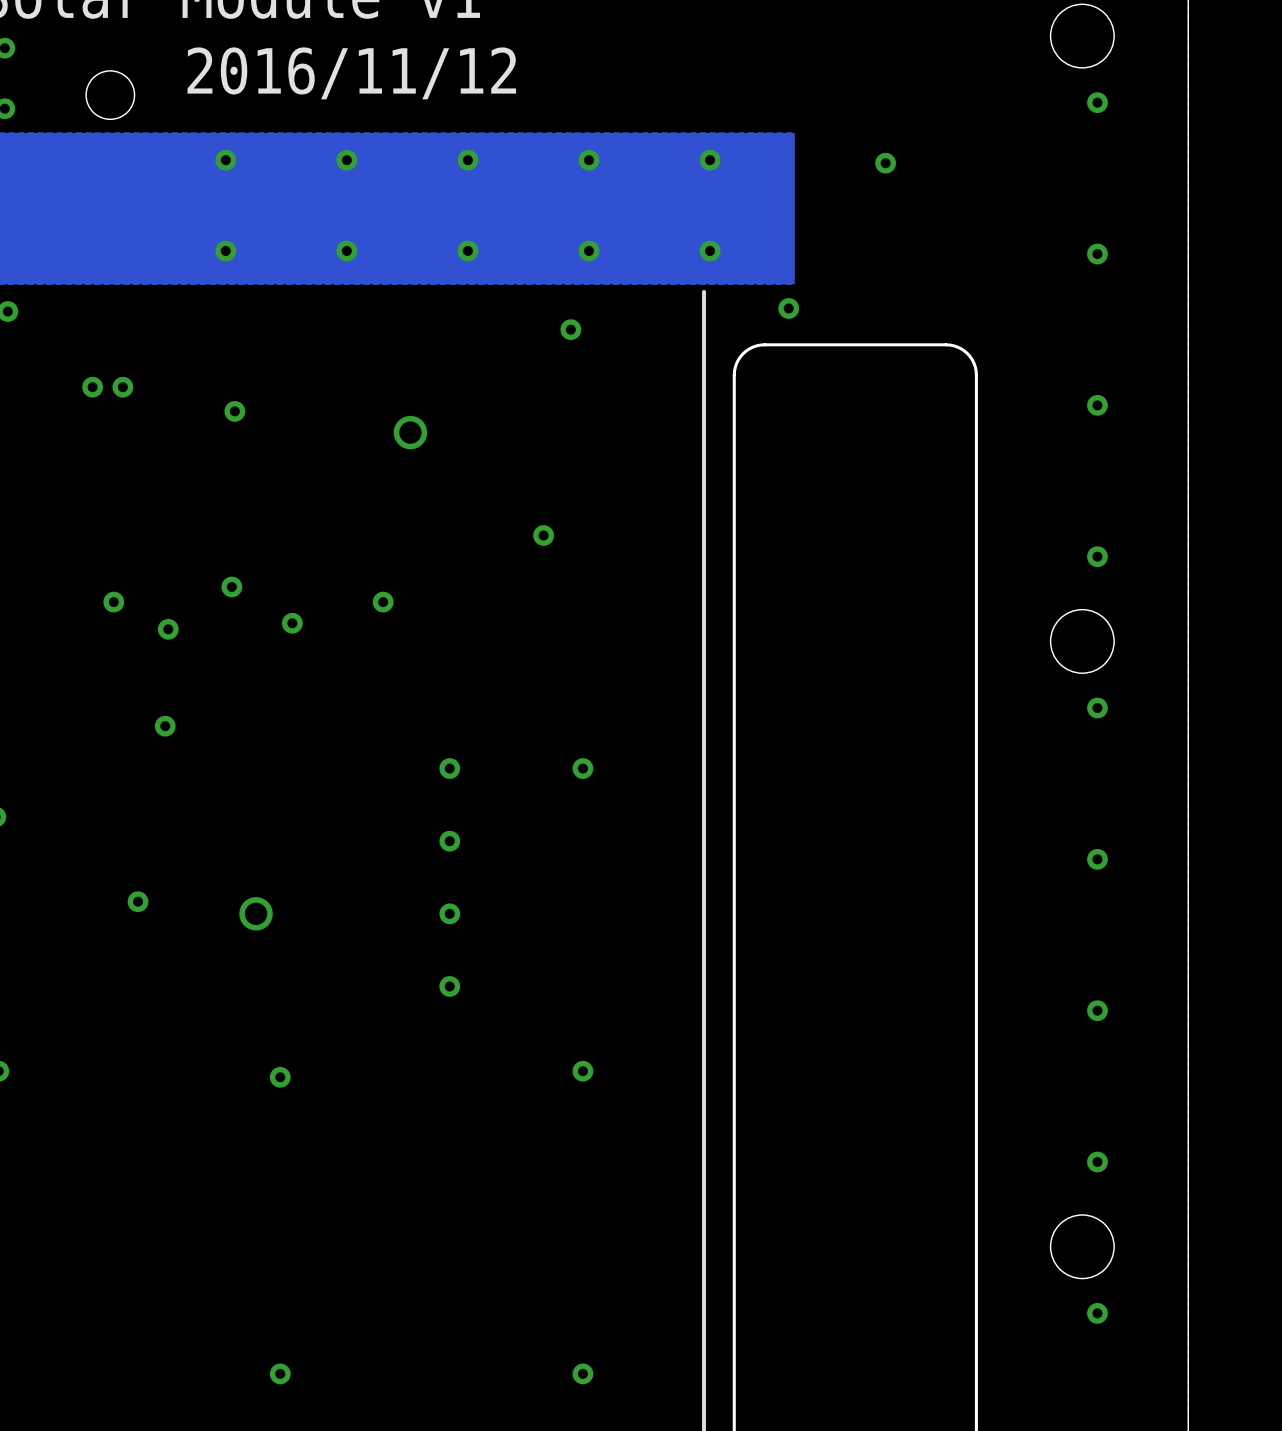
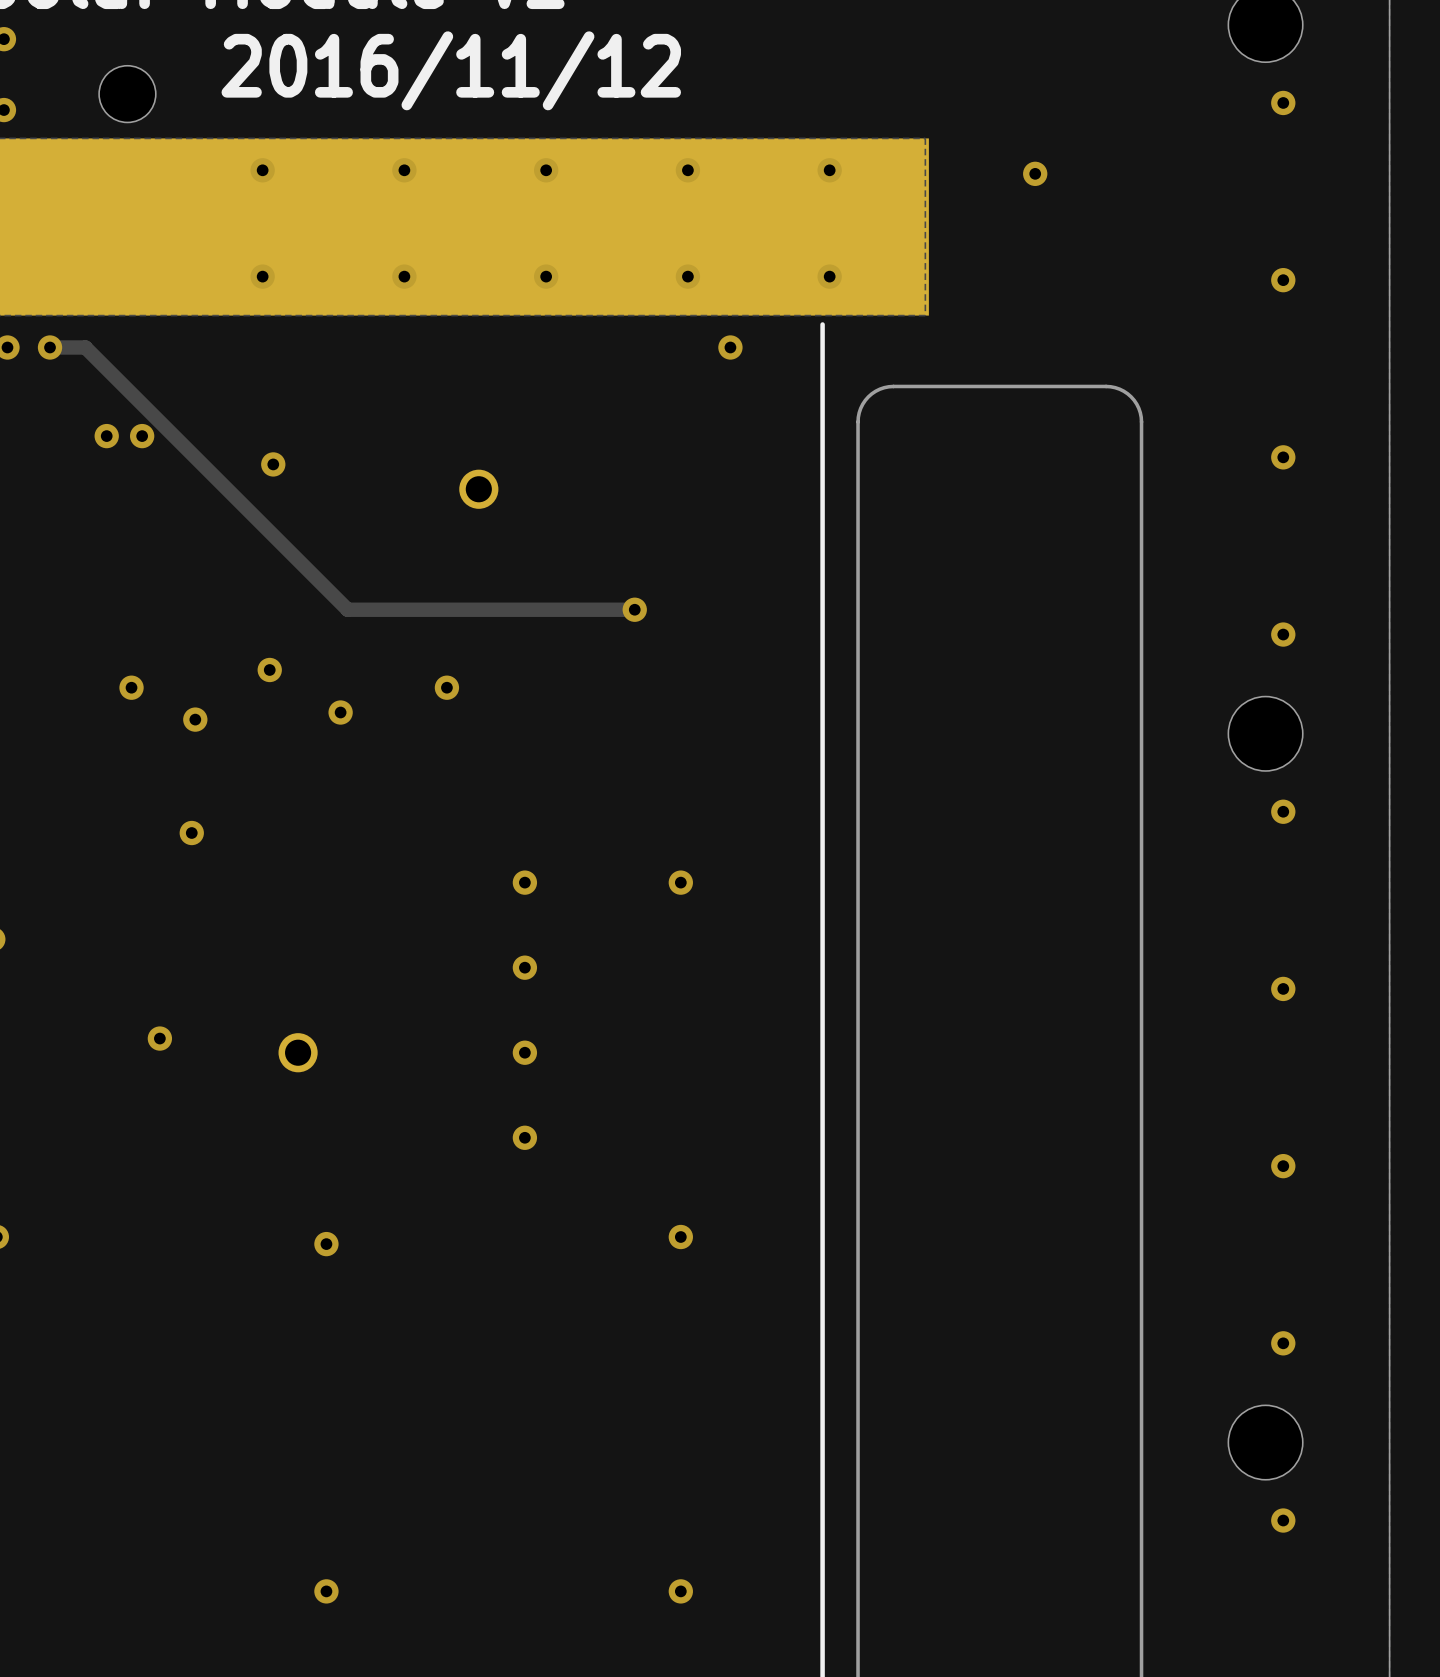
via: (788, 308) -> none
track: none -> (50, 347) (85, 347) (347, 609) (634, 609)
via: none -> (50, 347)
via position: (570, 329) -> (730, 347)

